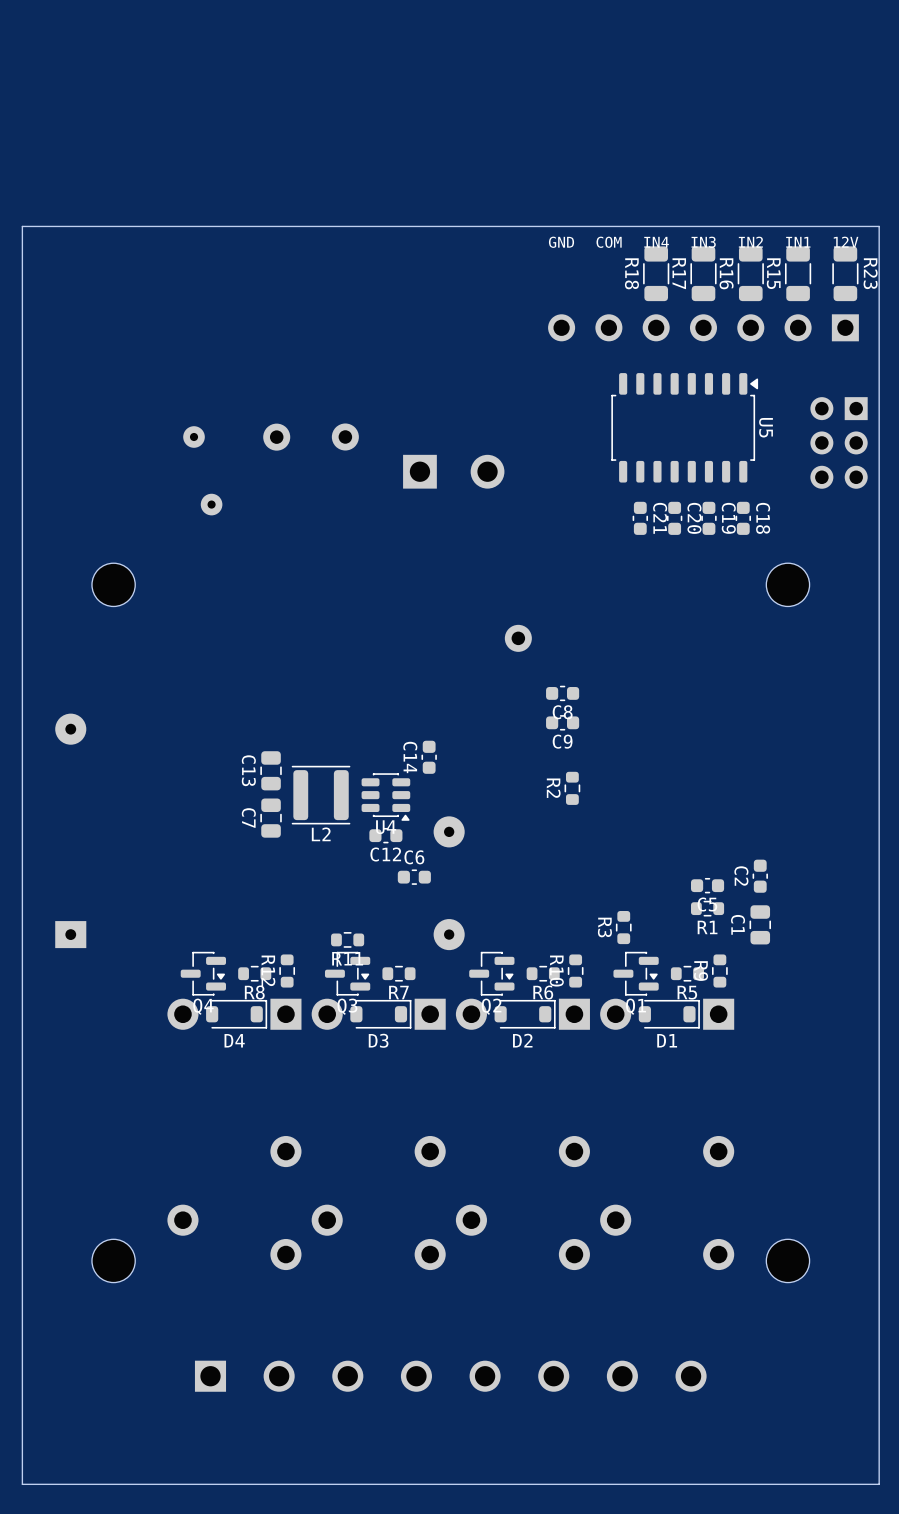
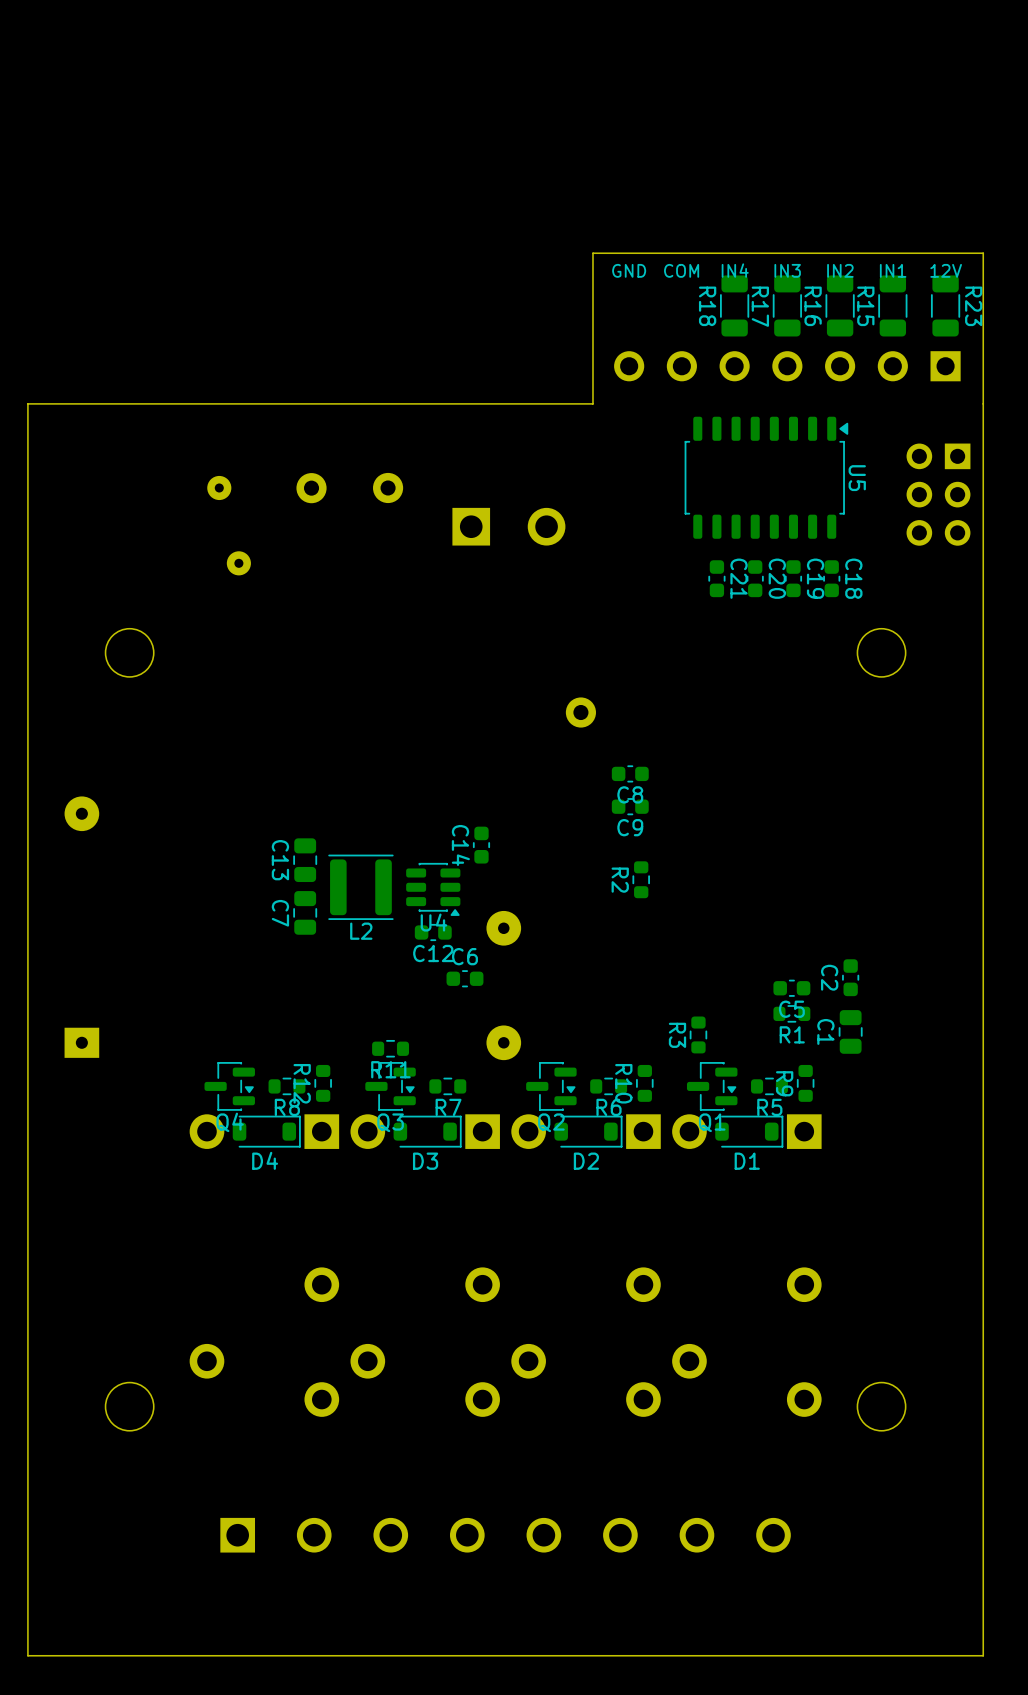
board edge: (529, 226) (22, 226) (22, 361) -> (592, 253) (592, 403) (27, 403)

